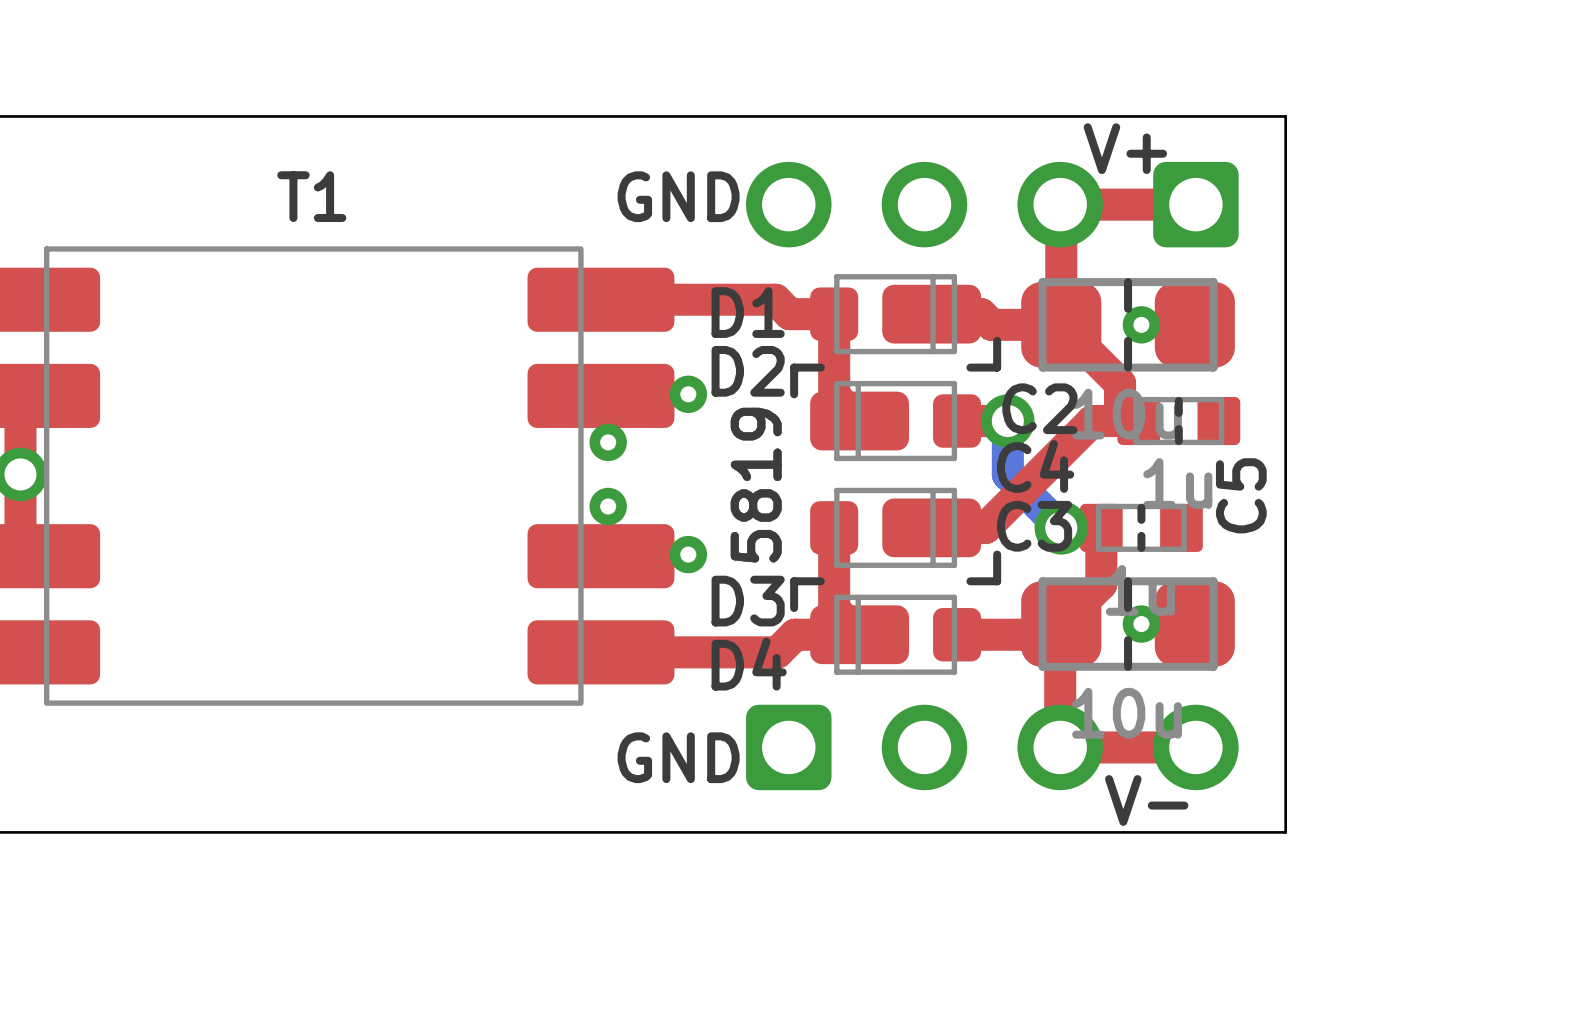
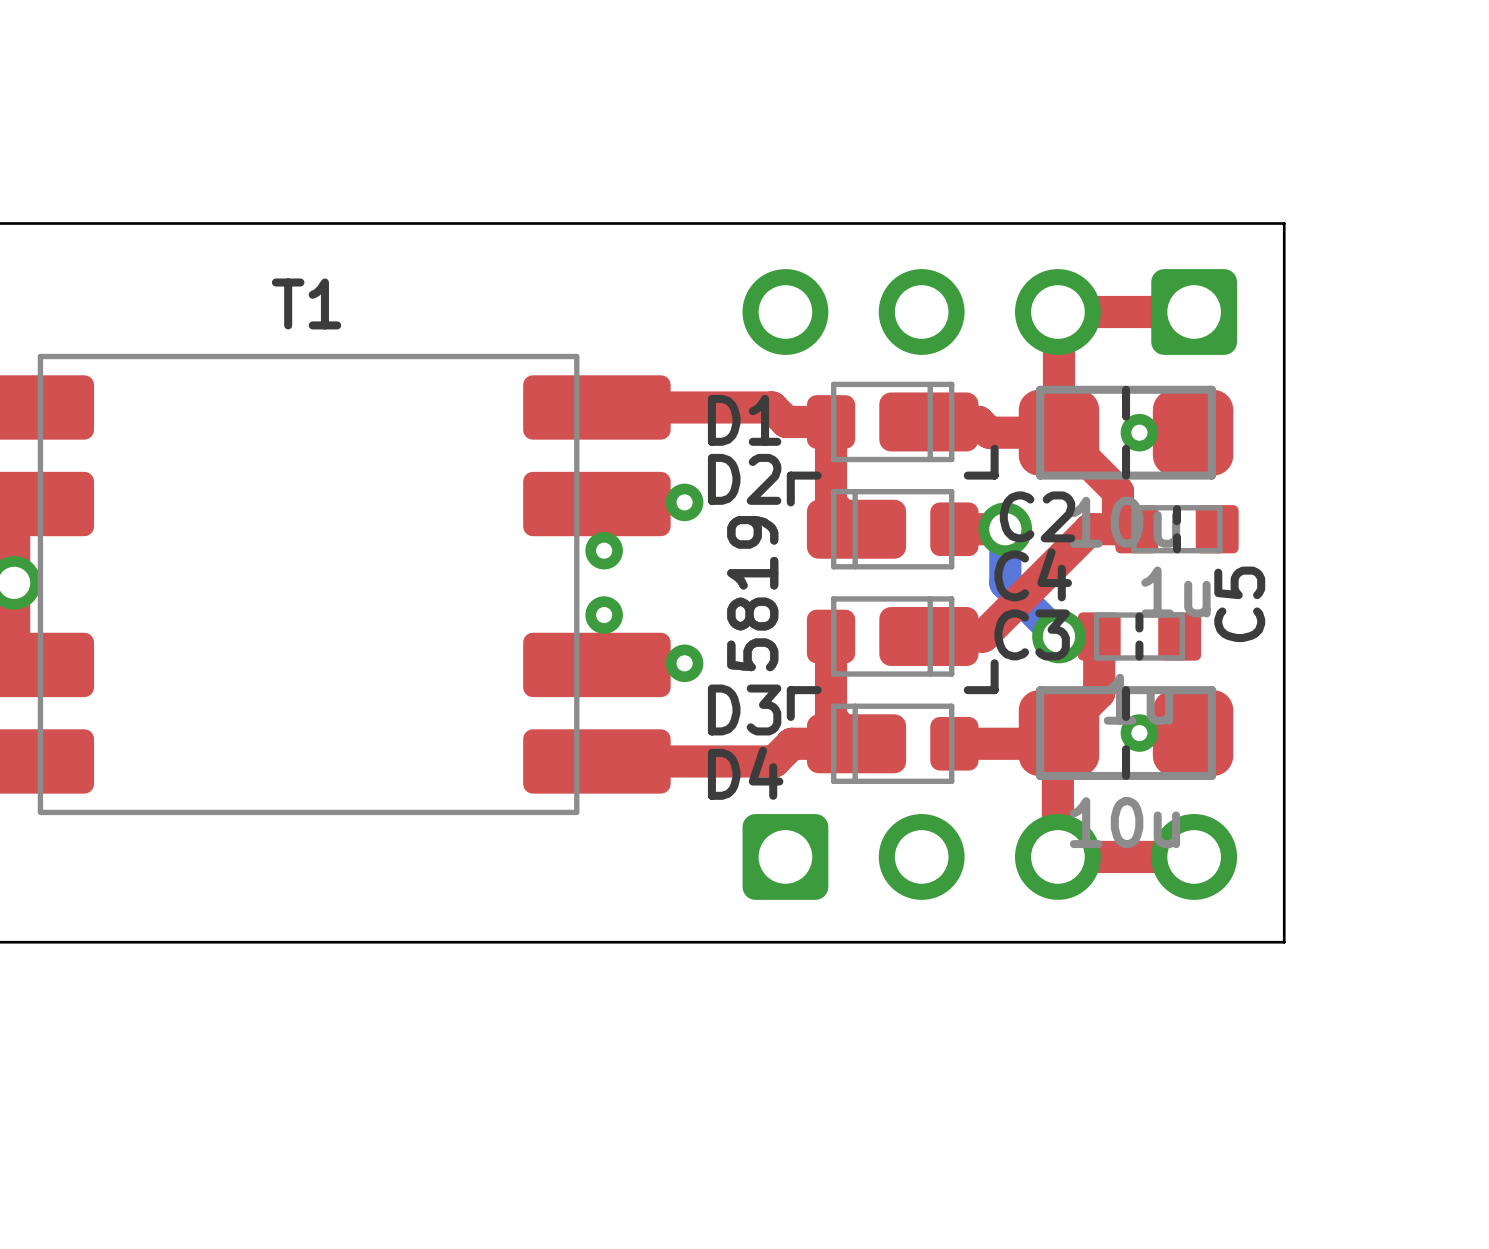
text: V+ (1125, 148) -> none
text: GND (678, 196) -> none
text: GND (678, 757) -> none
text: V- (1146, 800) -> none

